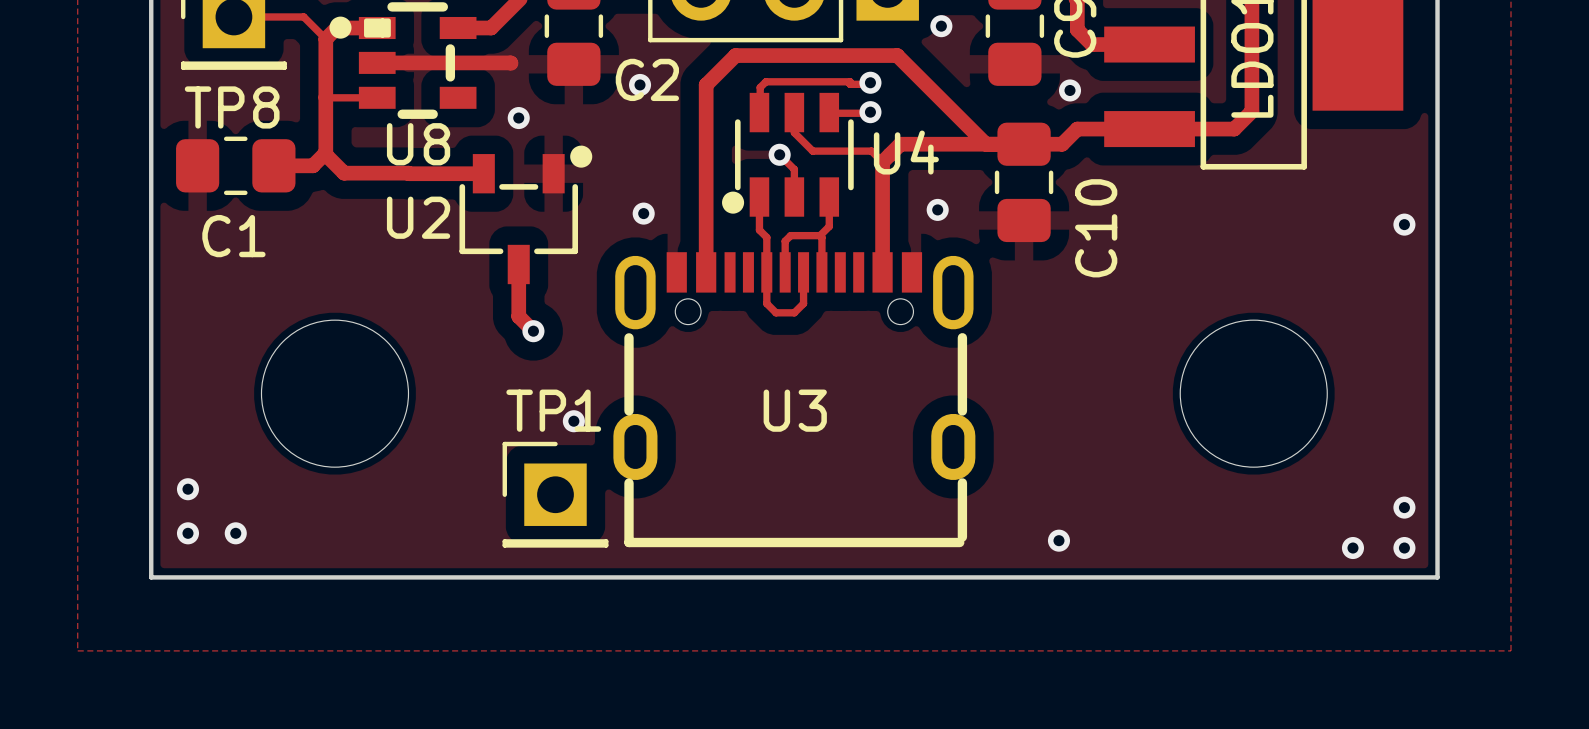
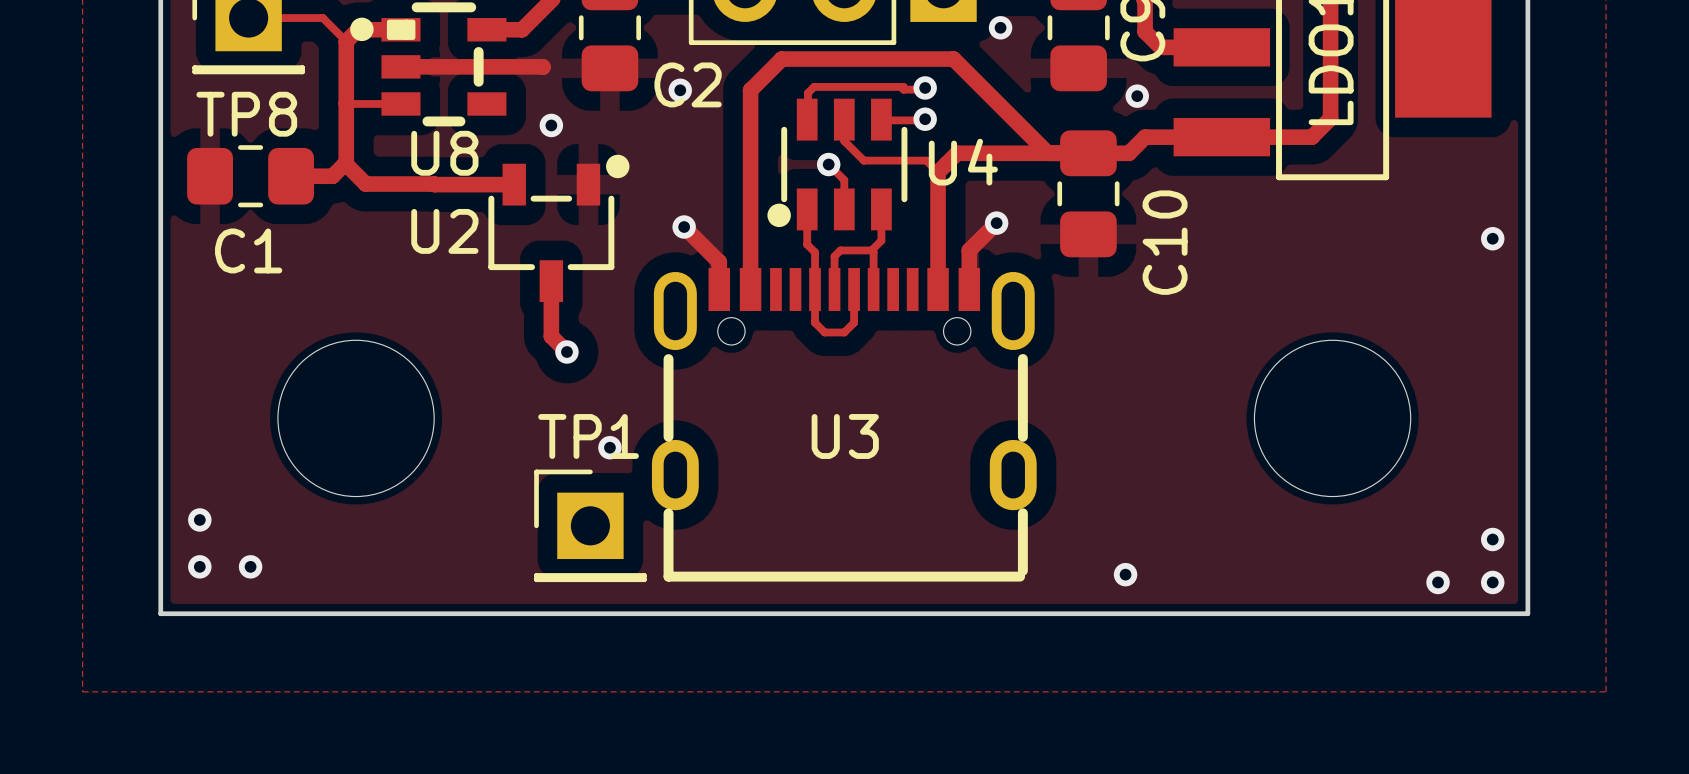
track: none -> (996, 223) (969, 250) (969, 289)
track: none -> (684, 227) (719, 262) (719, 289)

